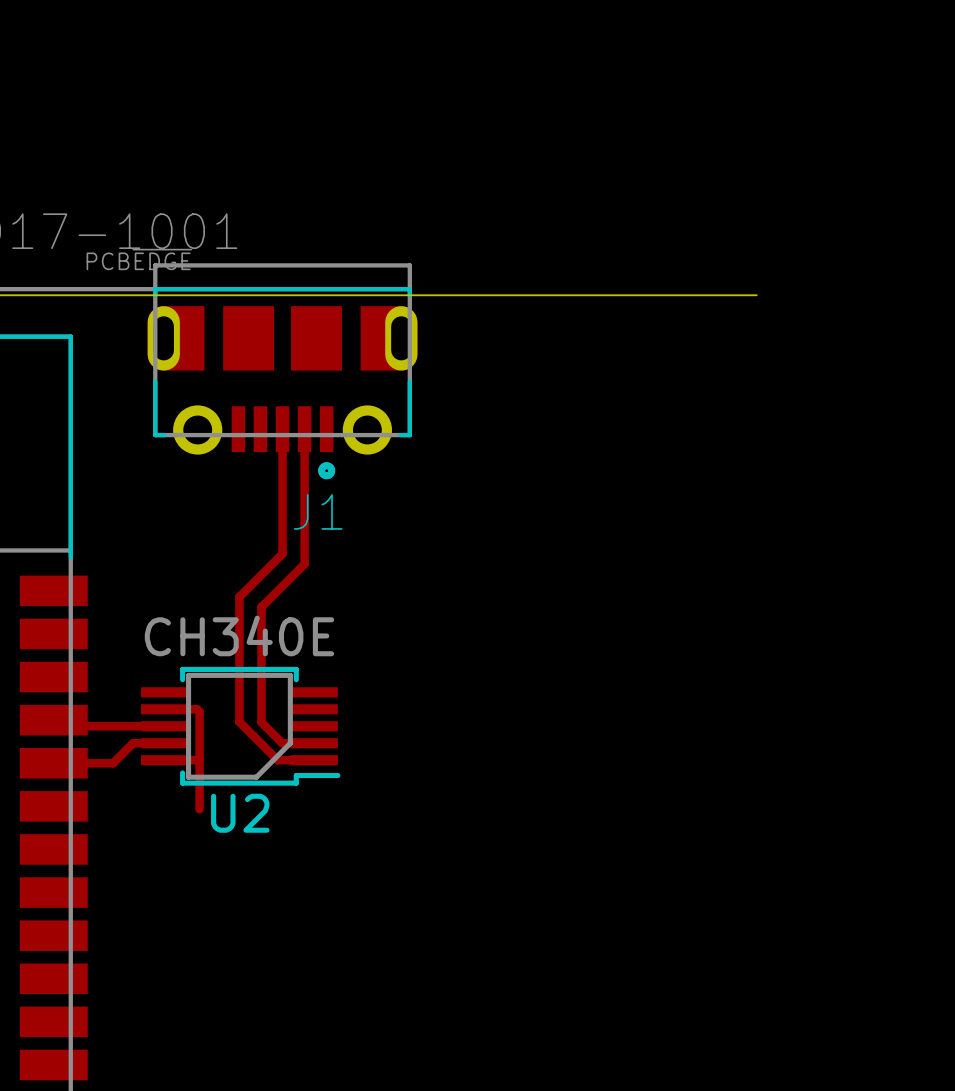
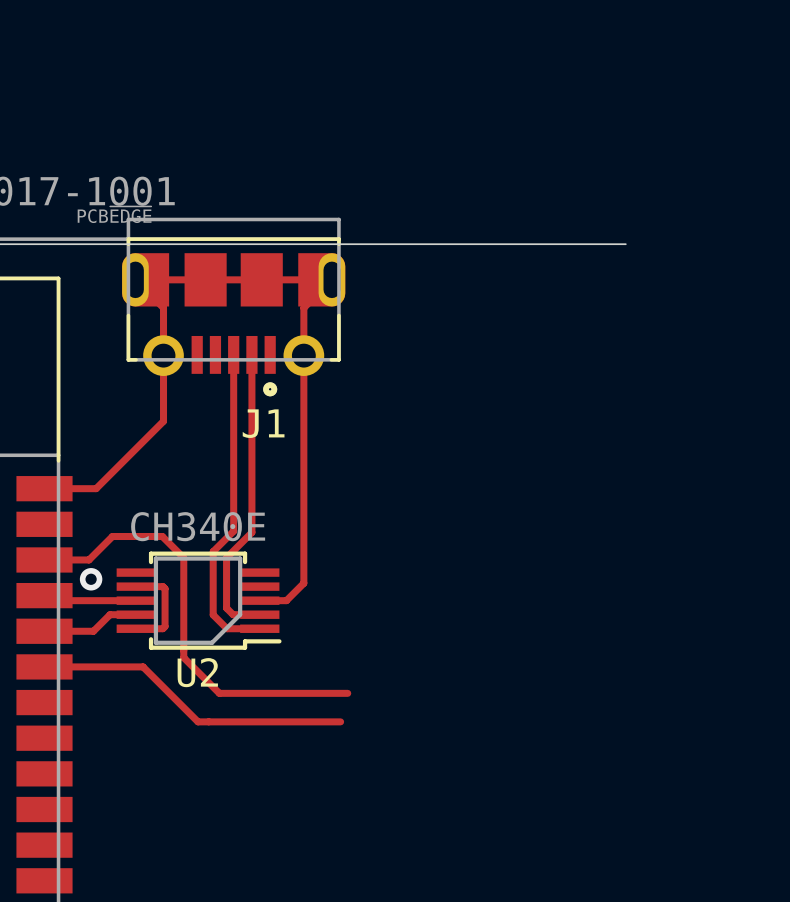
top track: (282, 553) (239, 596) (239, 721) (277, 760) -> (233, 458) (233, 531) (213, 551) (213, 614) (227, 628) (229, 628)
top track: (304, 564) (261, 607) (261, 722) (282, 743) -> (251, 466) (251, 532) (226, 557) (226, 608) (233, 614)
top track: none -> (44, 488) (96, 488) (163, 421) (163, 307) (135, 279) (331, 279) (303, 307) (303, 583) (286, 600) (259, 600)
top track: none -> (44, 559) (89, 559) (112, 536) (162, 536) (183, 557) (183, 657) (219, 693) (347, 693)
via: none -> (91, 579)
top track: (199, 757) (199, 809) -> none
top track: none -> (44, 666) (143, 666) (198, 721) (340, 721)

